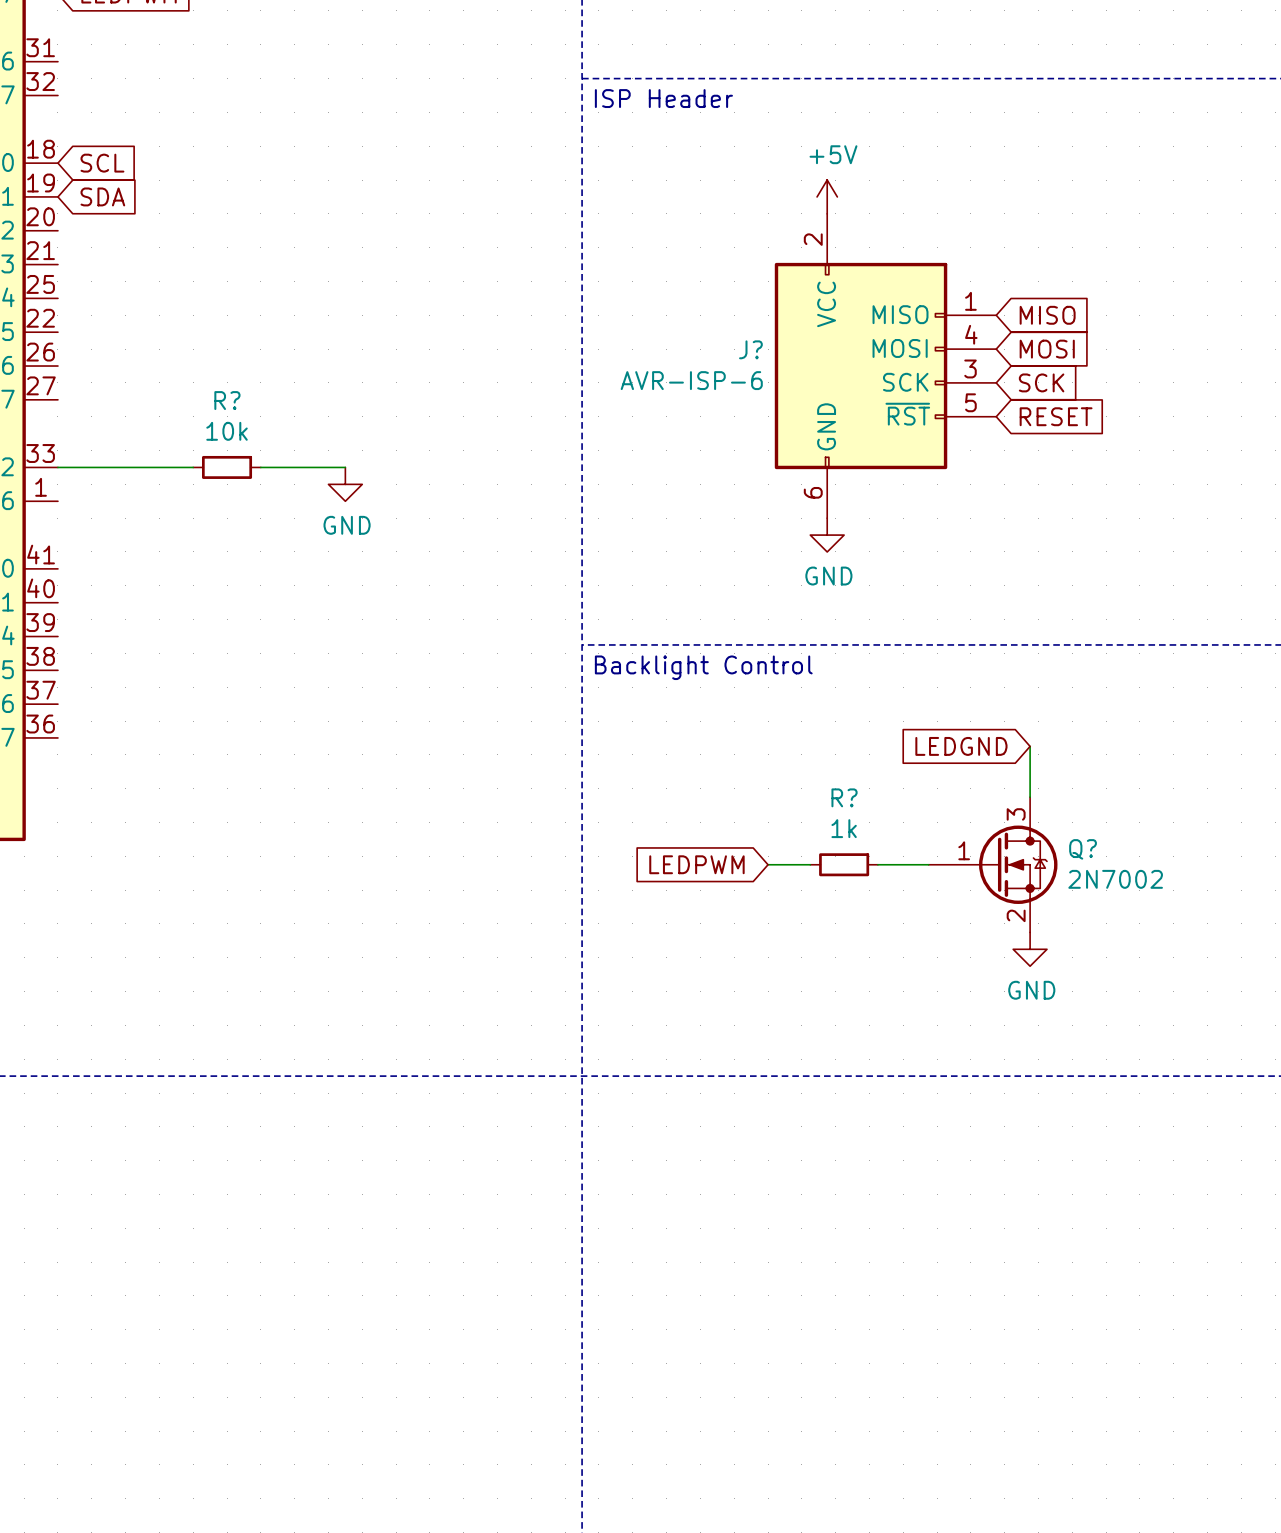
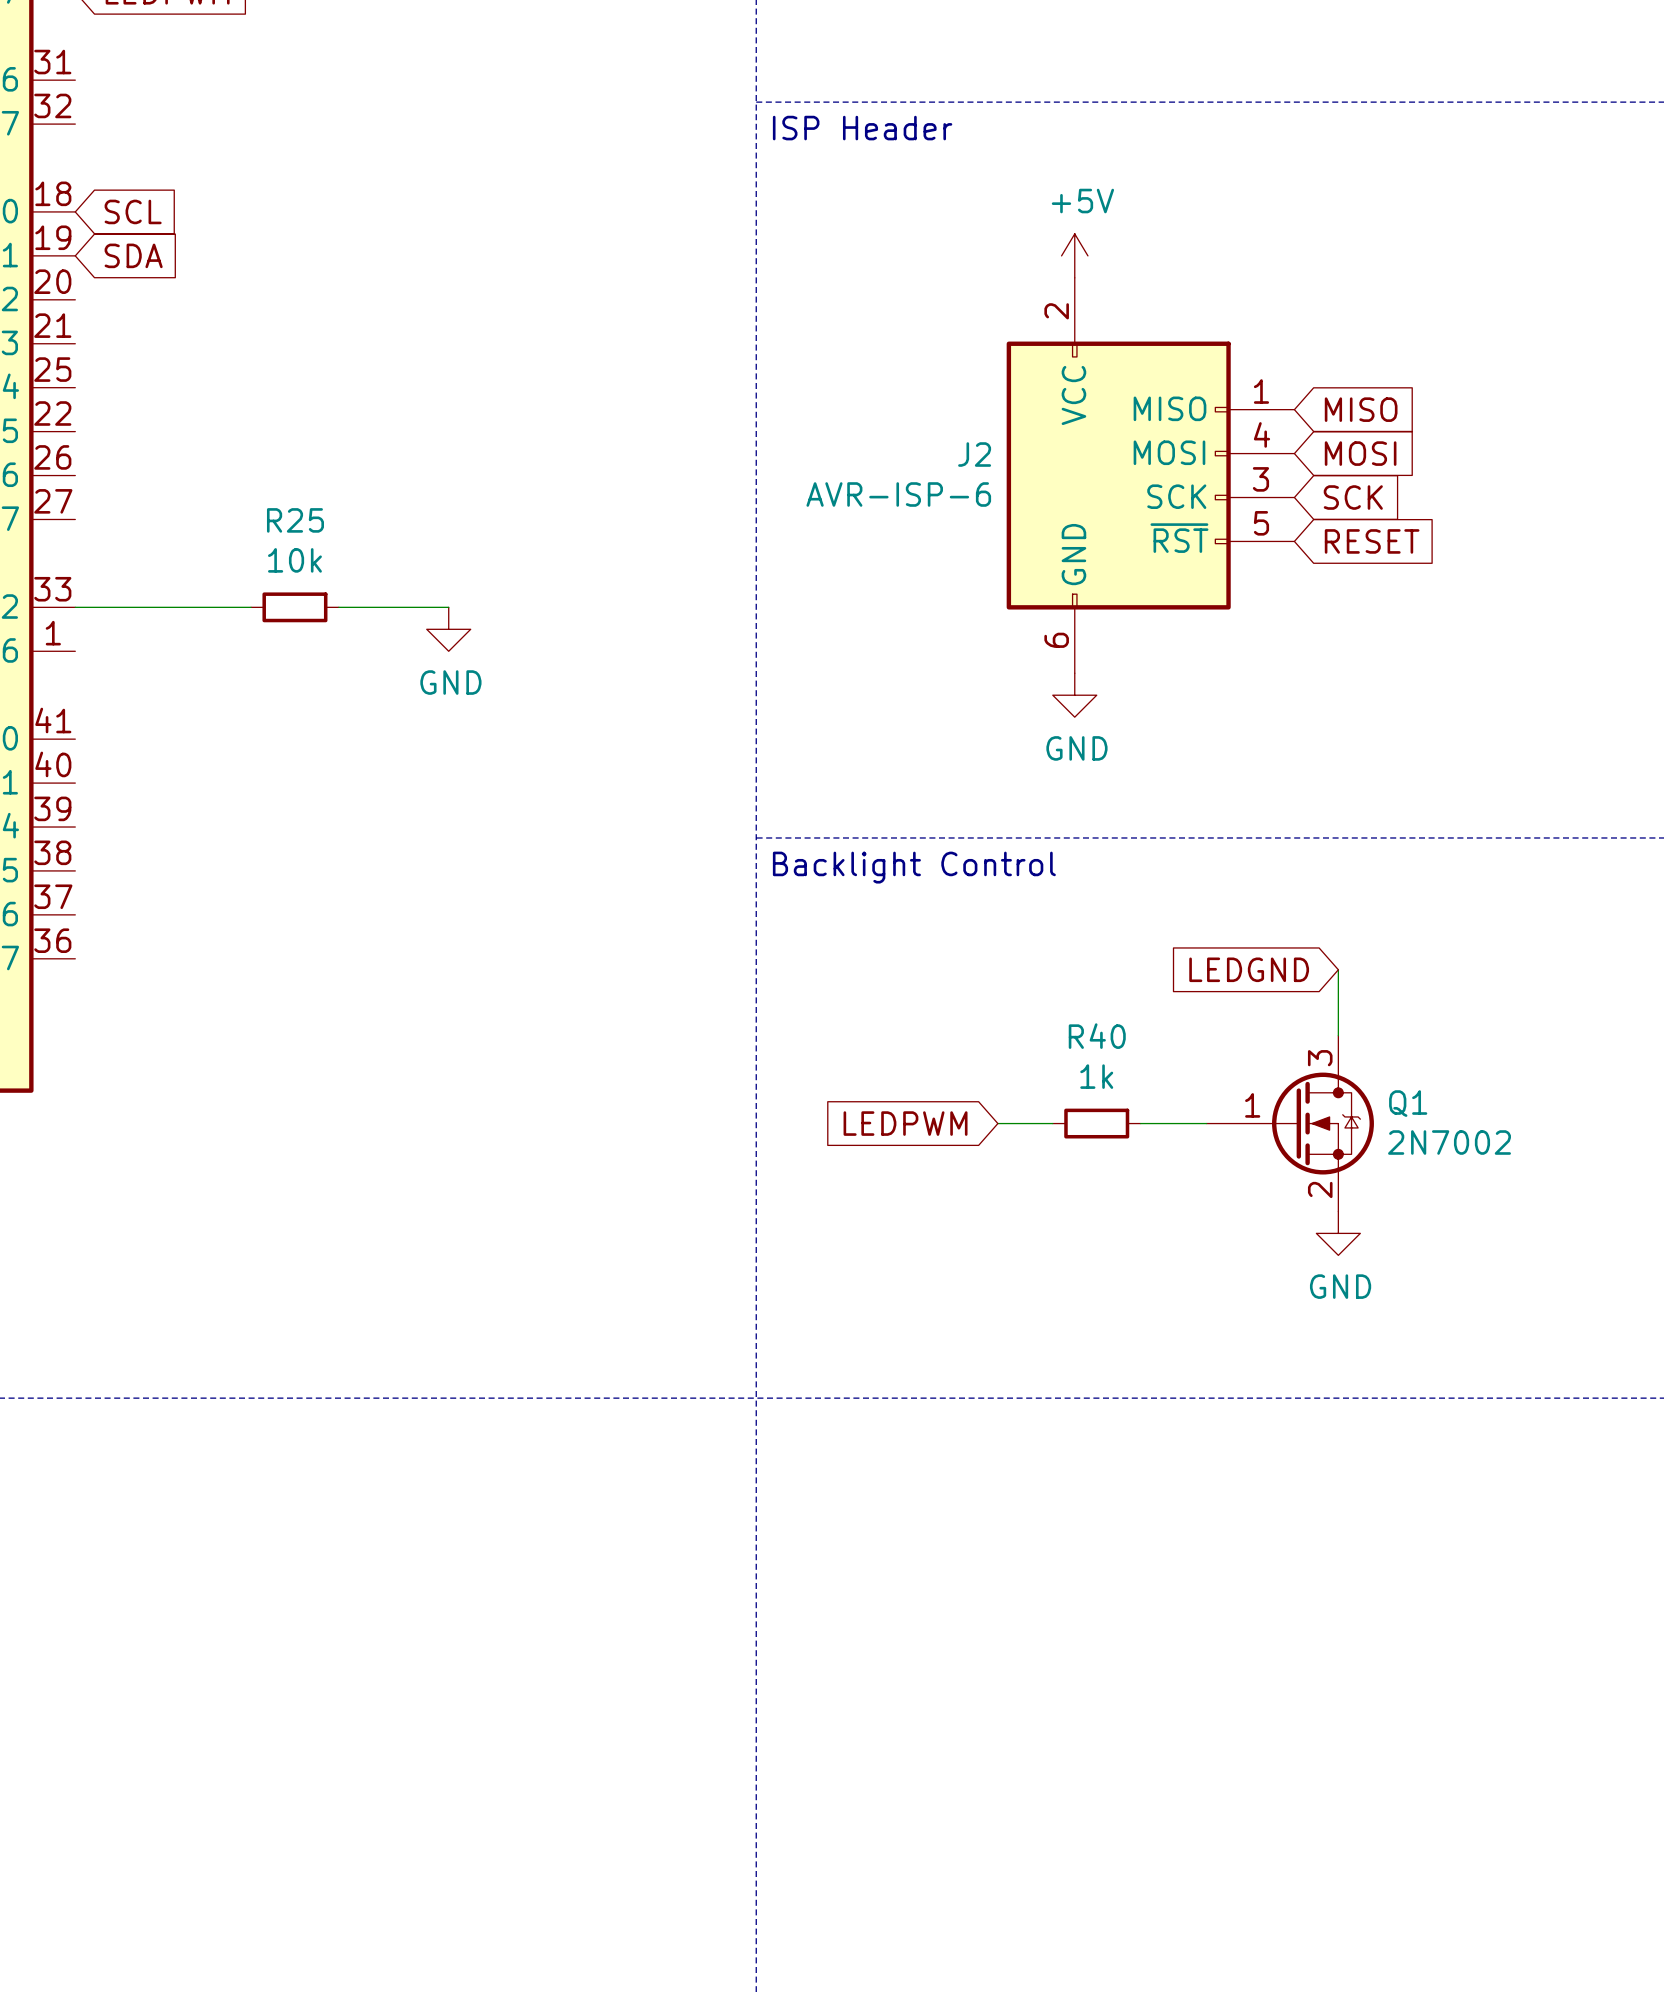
J? name: J? (750, 349) -> J2 (974, 454)
R? name: R? (227, 400) -> R25 (295, 520)
R? name: R? (844, 797) -> R40 (1097, 1036)
Q? name: Q? (1083, 849) -> Q1 (1408, 1103)

